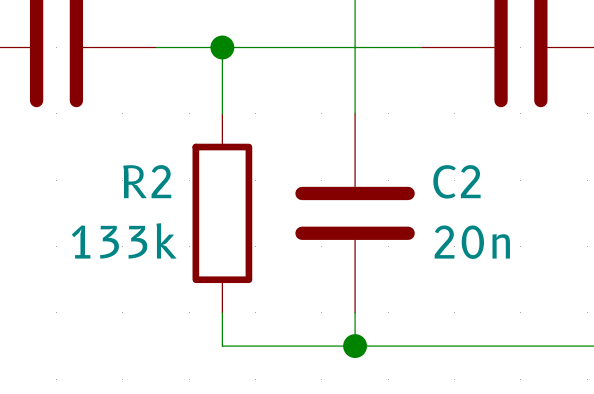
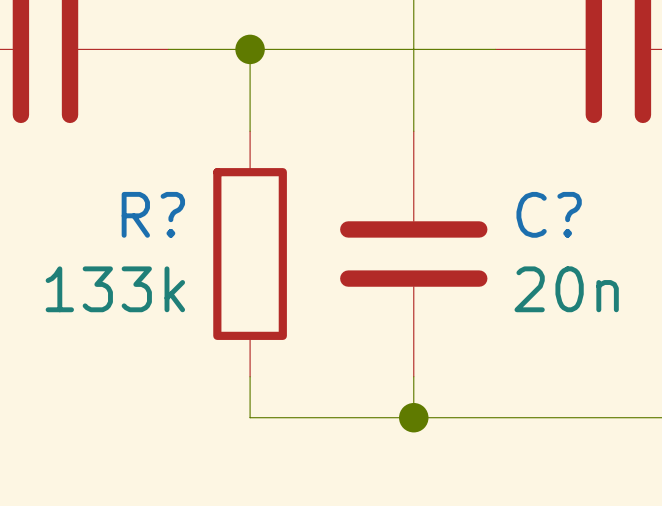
R2 name: R2 (147, 181) -> R? (153, 214)
C2 name: C2 (456, 181) -> C? (549, 214)

